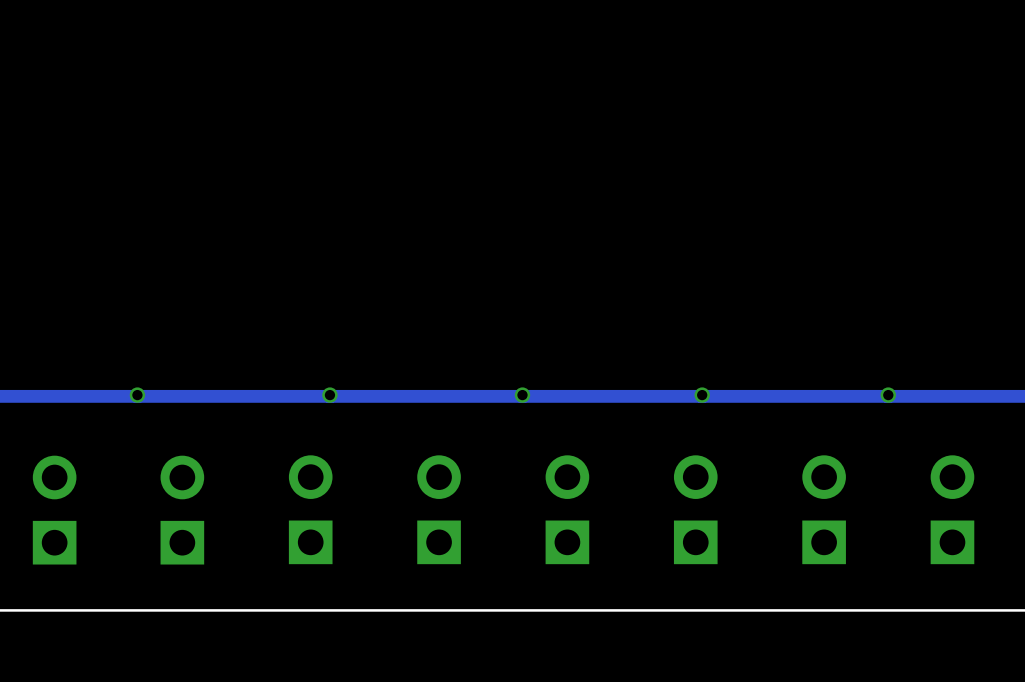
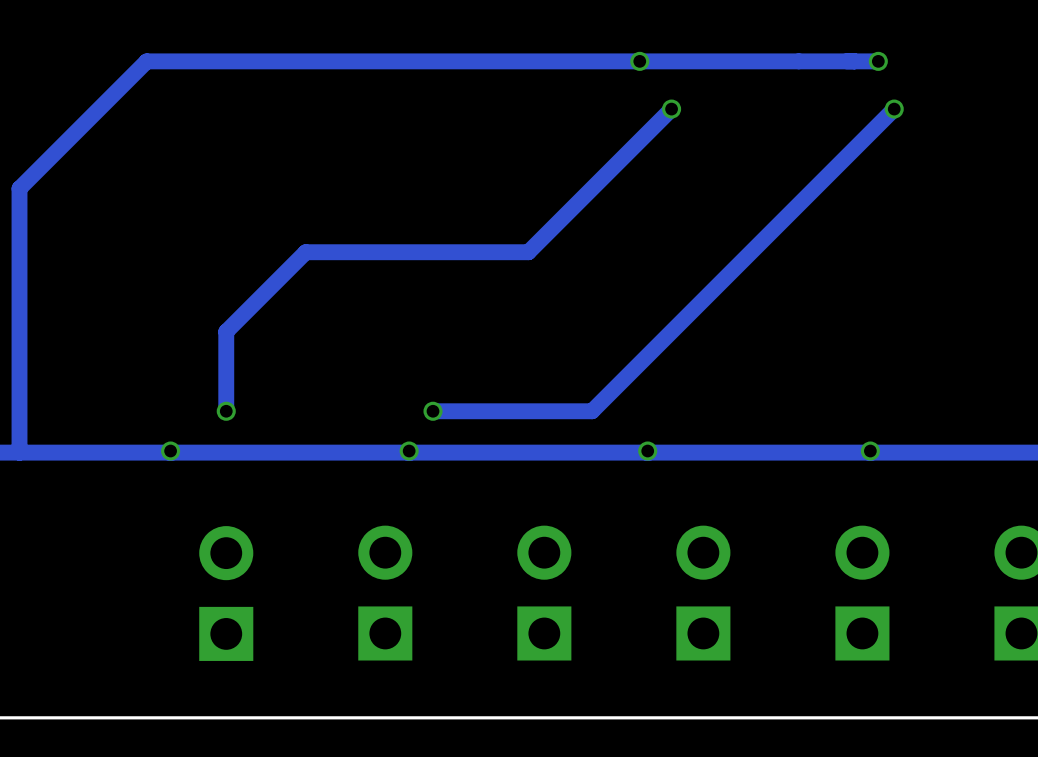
via: none -> (639, 61)
track: none -> (878, 61) (146, 61) (19, 188) (19, 452)
via: none -> (878, 61)
track: none -> (671, 109) (528, 252) (305, 252) (226, 331) (226, 411)
via: none -> (671, 109)
track: none -> (894, 109) (592, 411) (433, 411)
via: none -> (894, 109)
via: none -> (226, 411)
via: none -> (433, 411)
part: (54, 510) -> none

